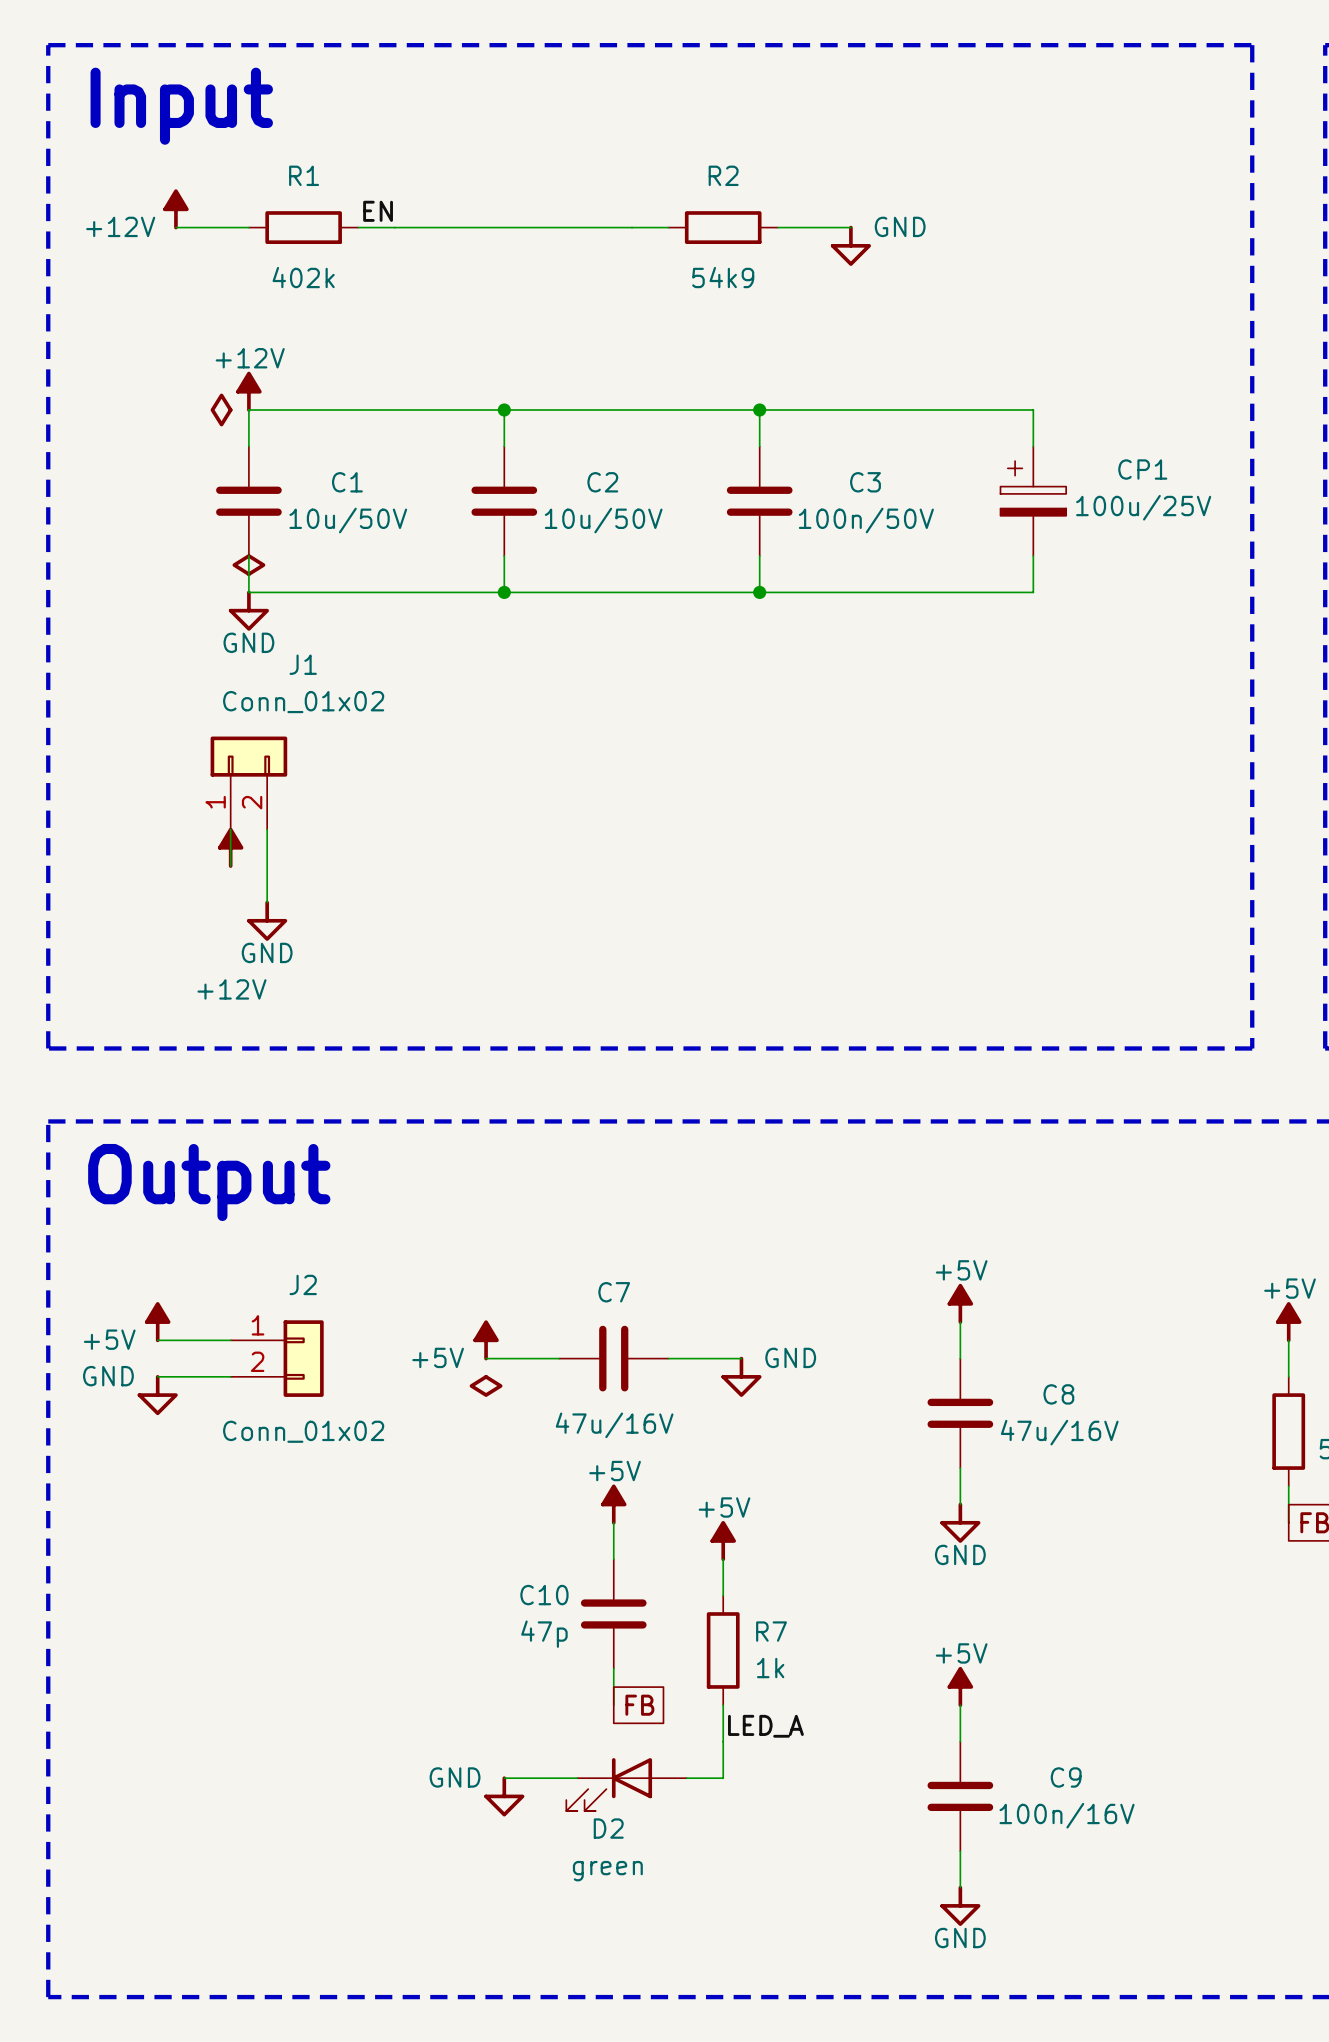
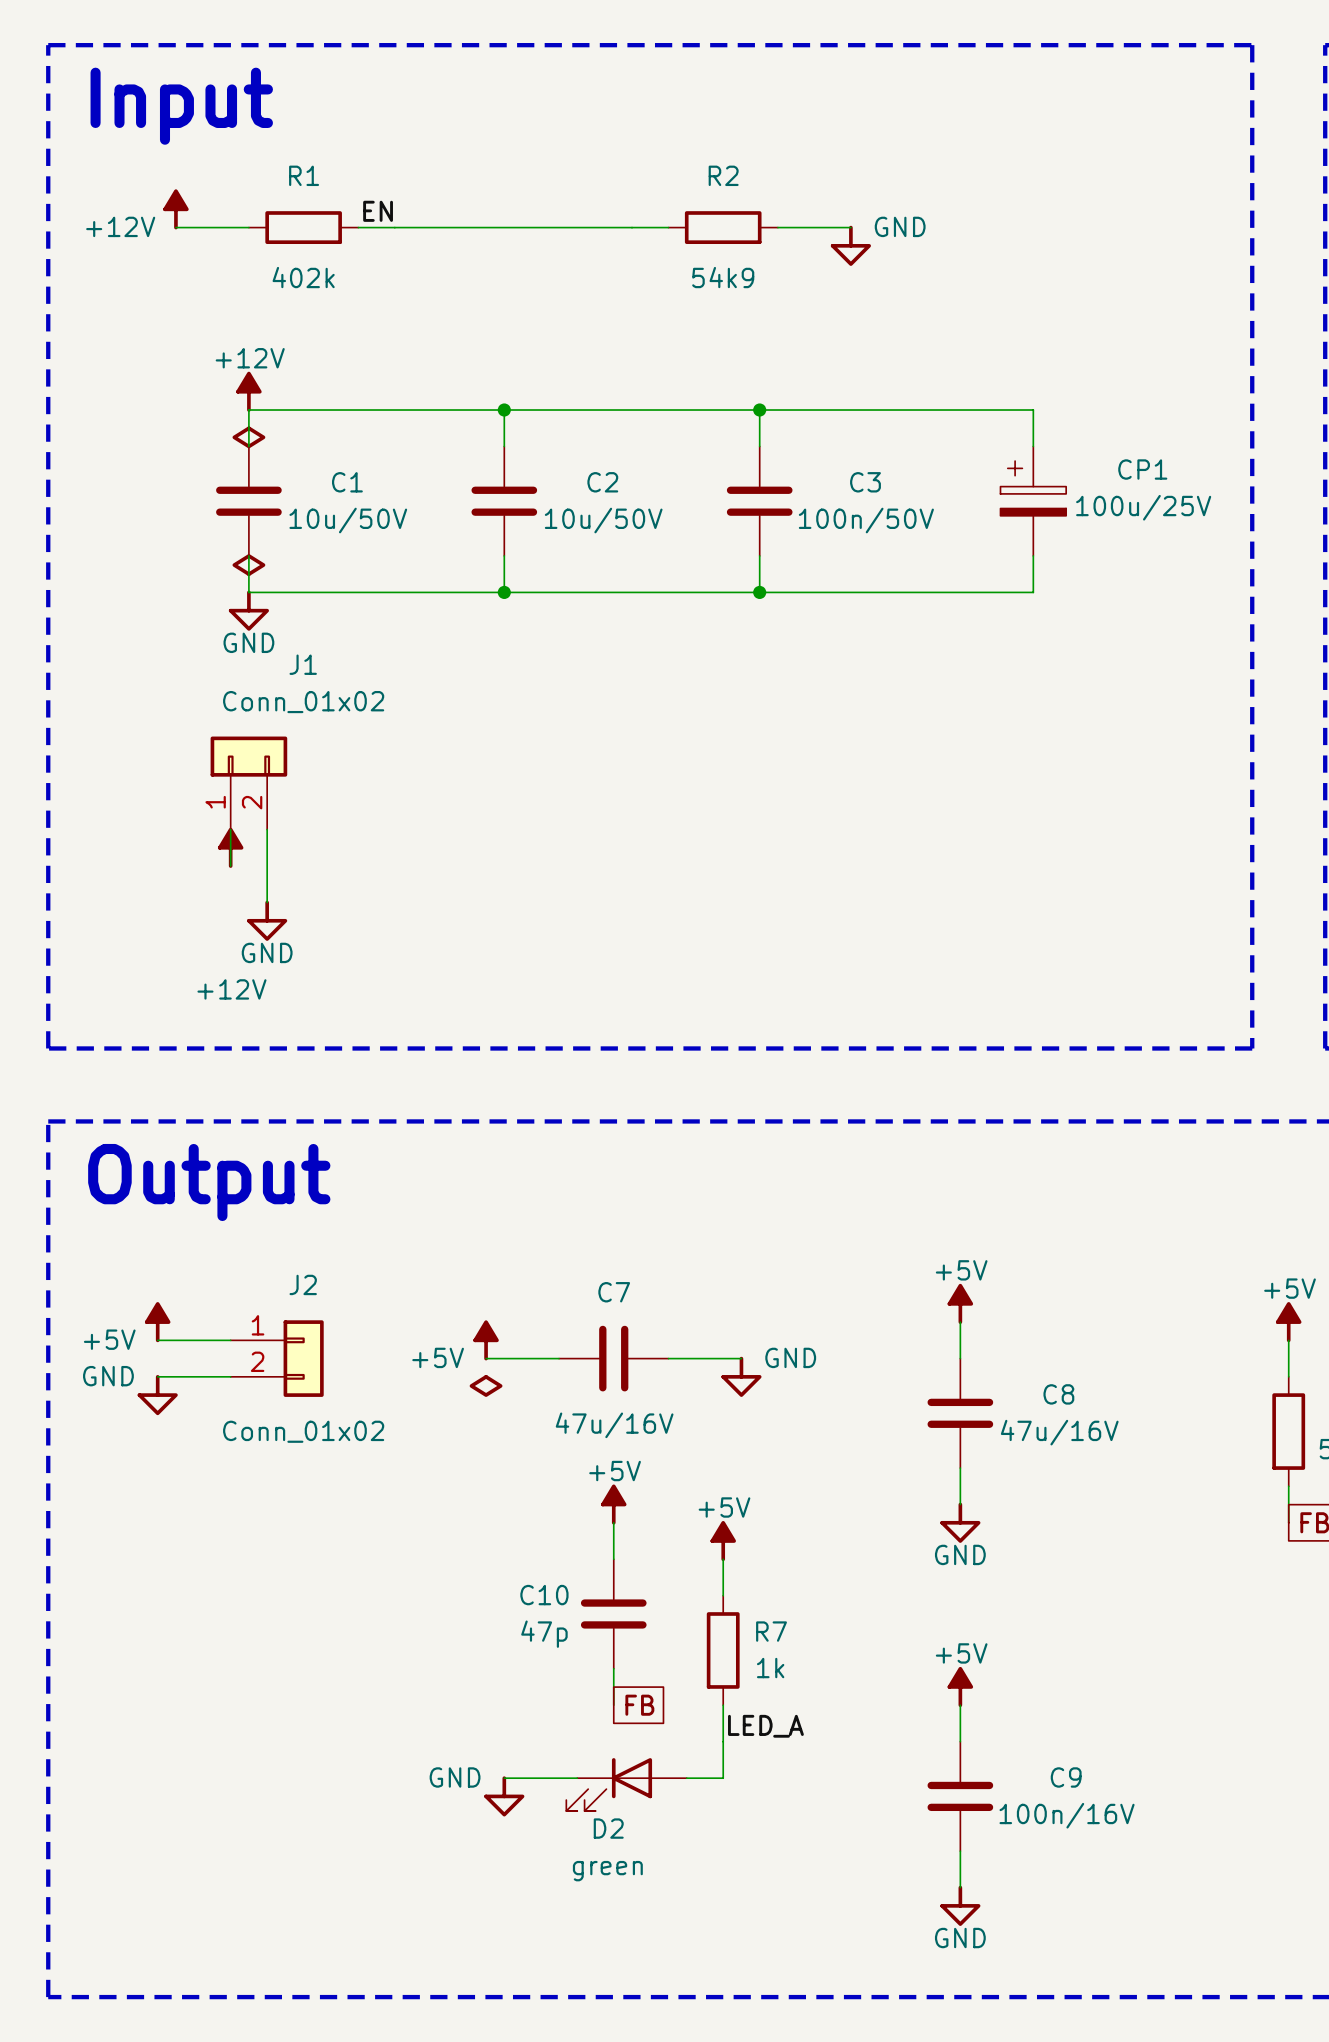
power symbol rotation: 0° (221, 410) -> 90° clockwise (248, 437)
power symbol position: (221, 410) -> (248, 437)

